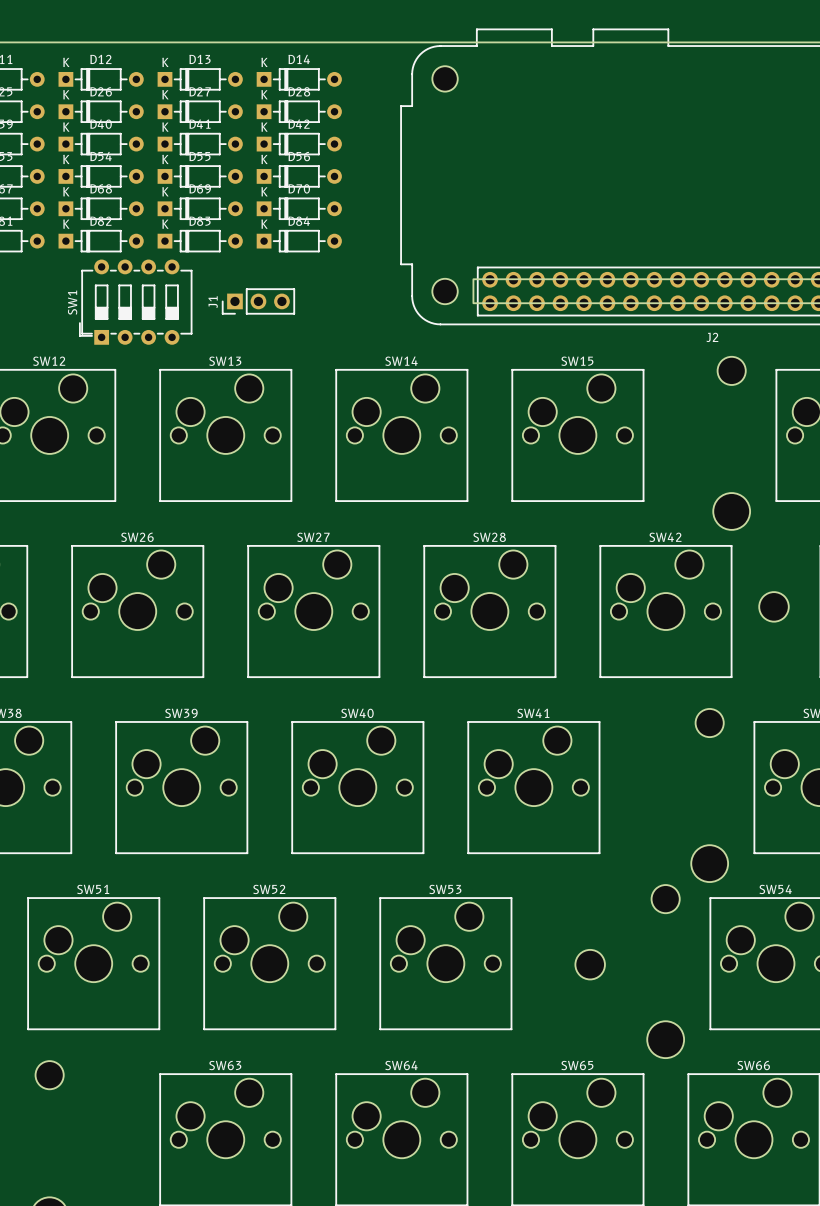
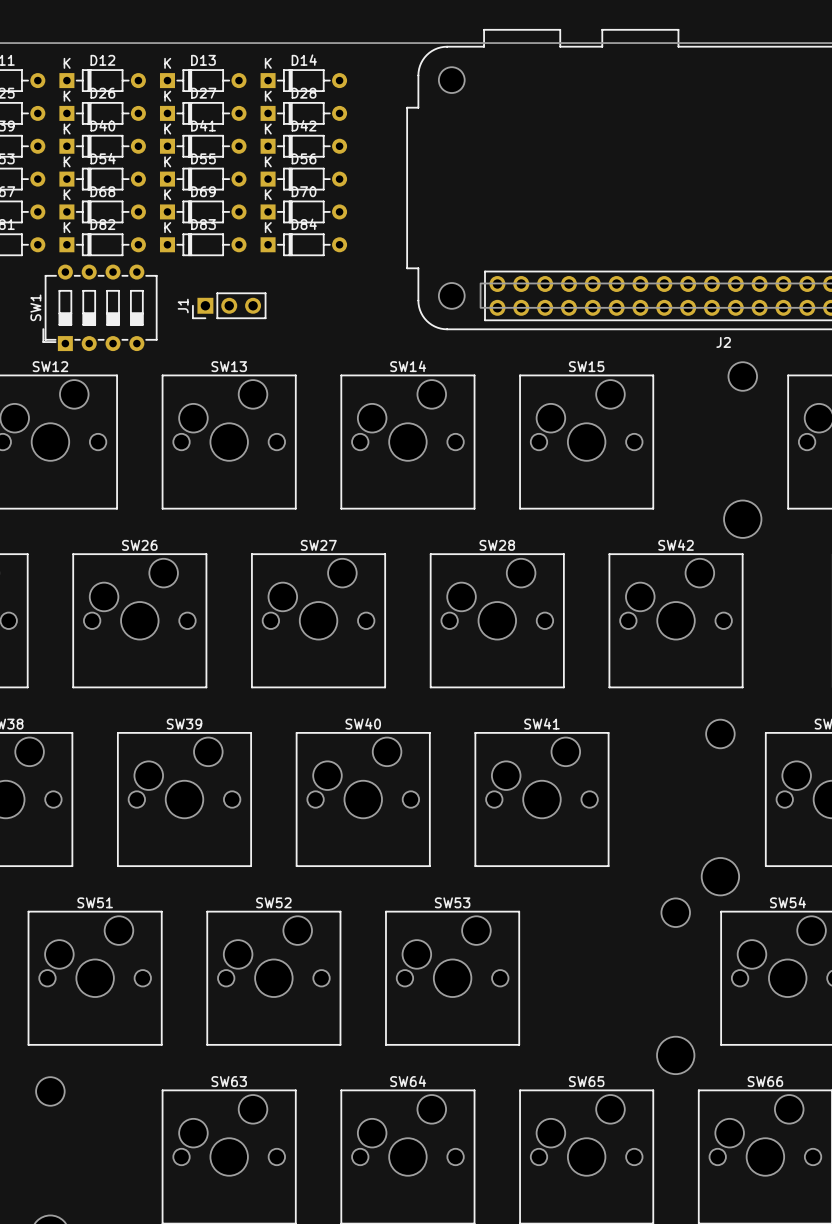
J1 position: (258, 301) -> (229, 305)
SW1 position: (135, 302) -> (100, 307)
part: (774, 606) -> none
part: (590, 964) -> none

